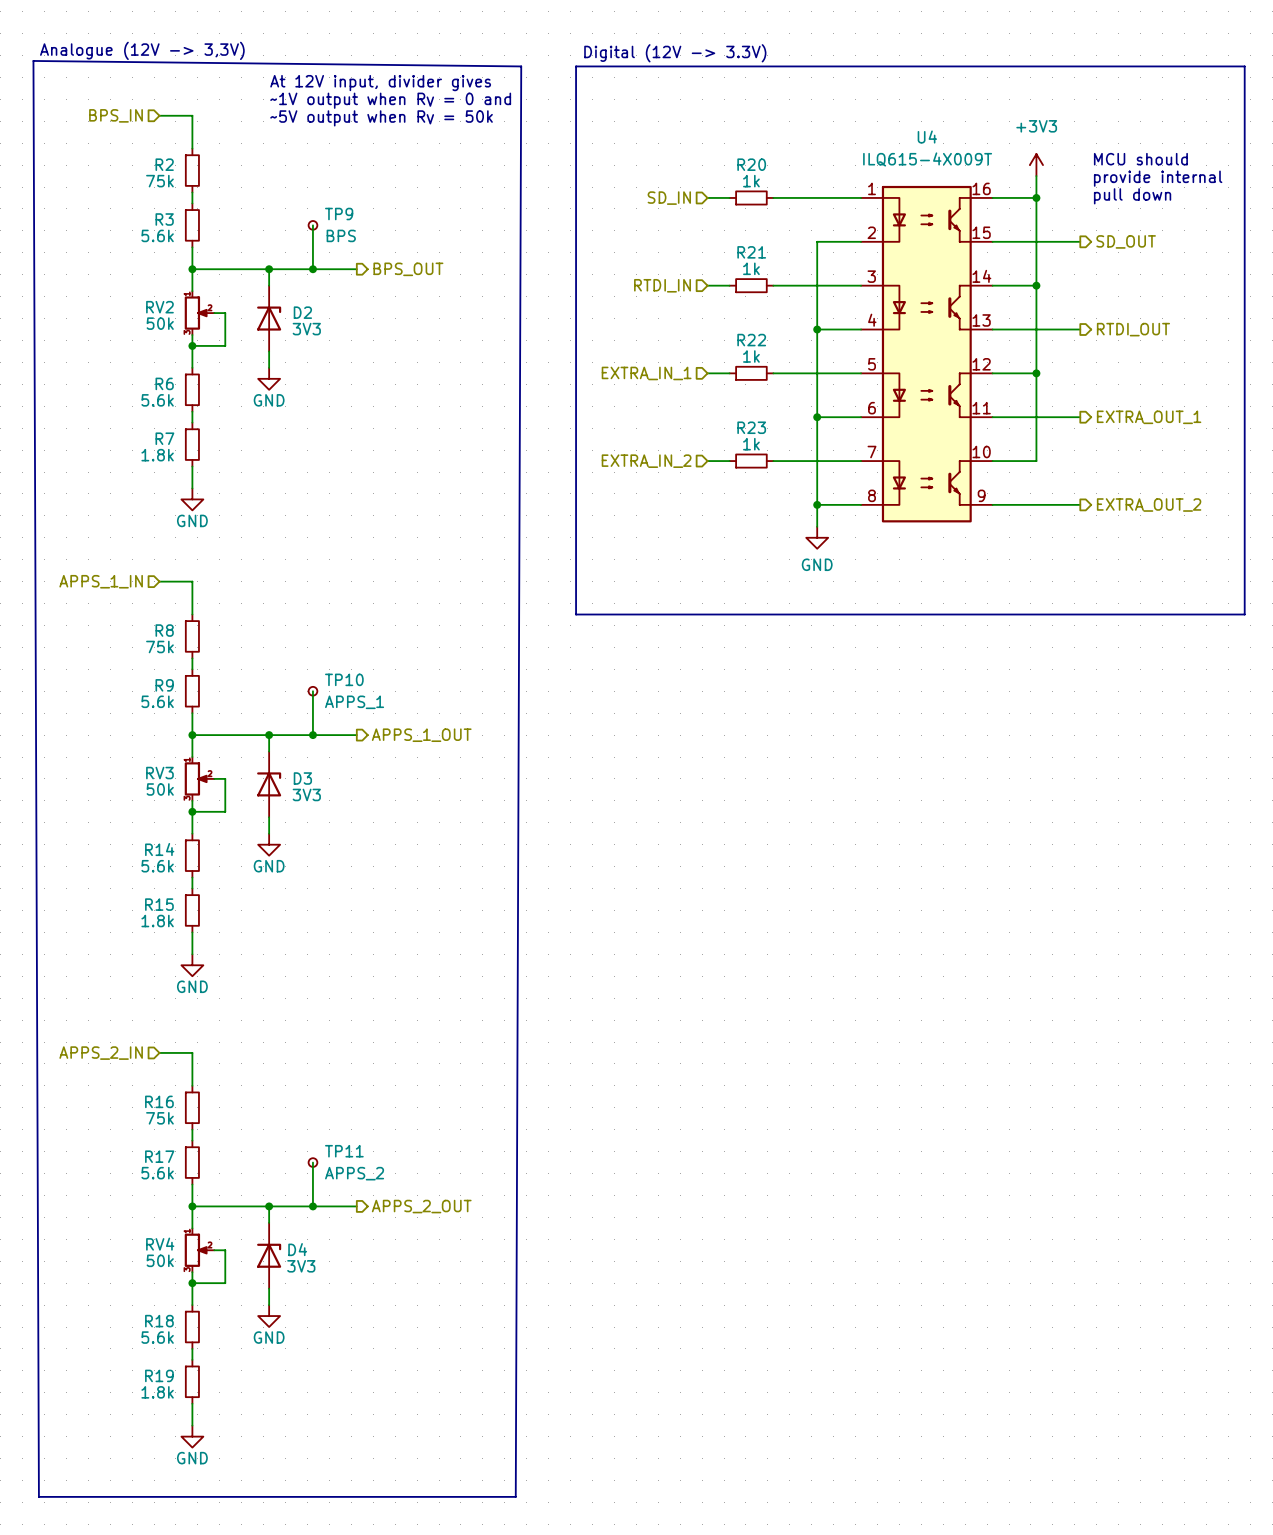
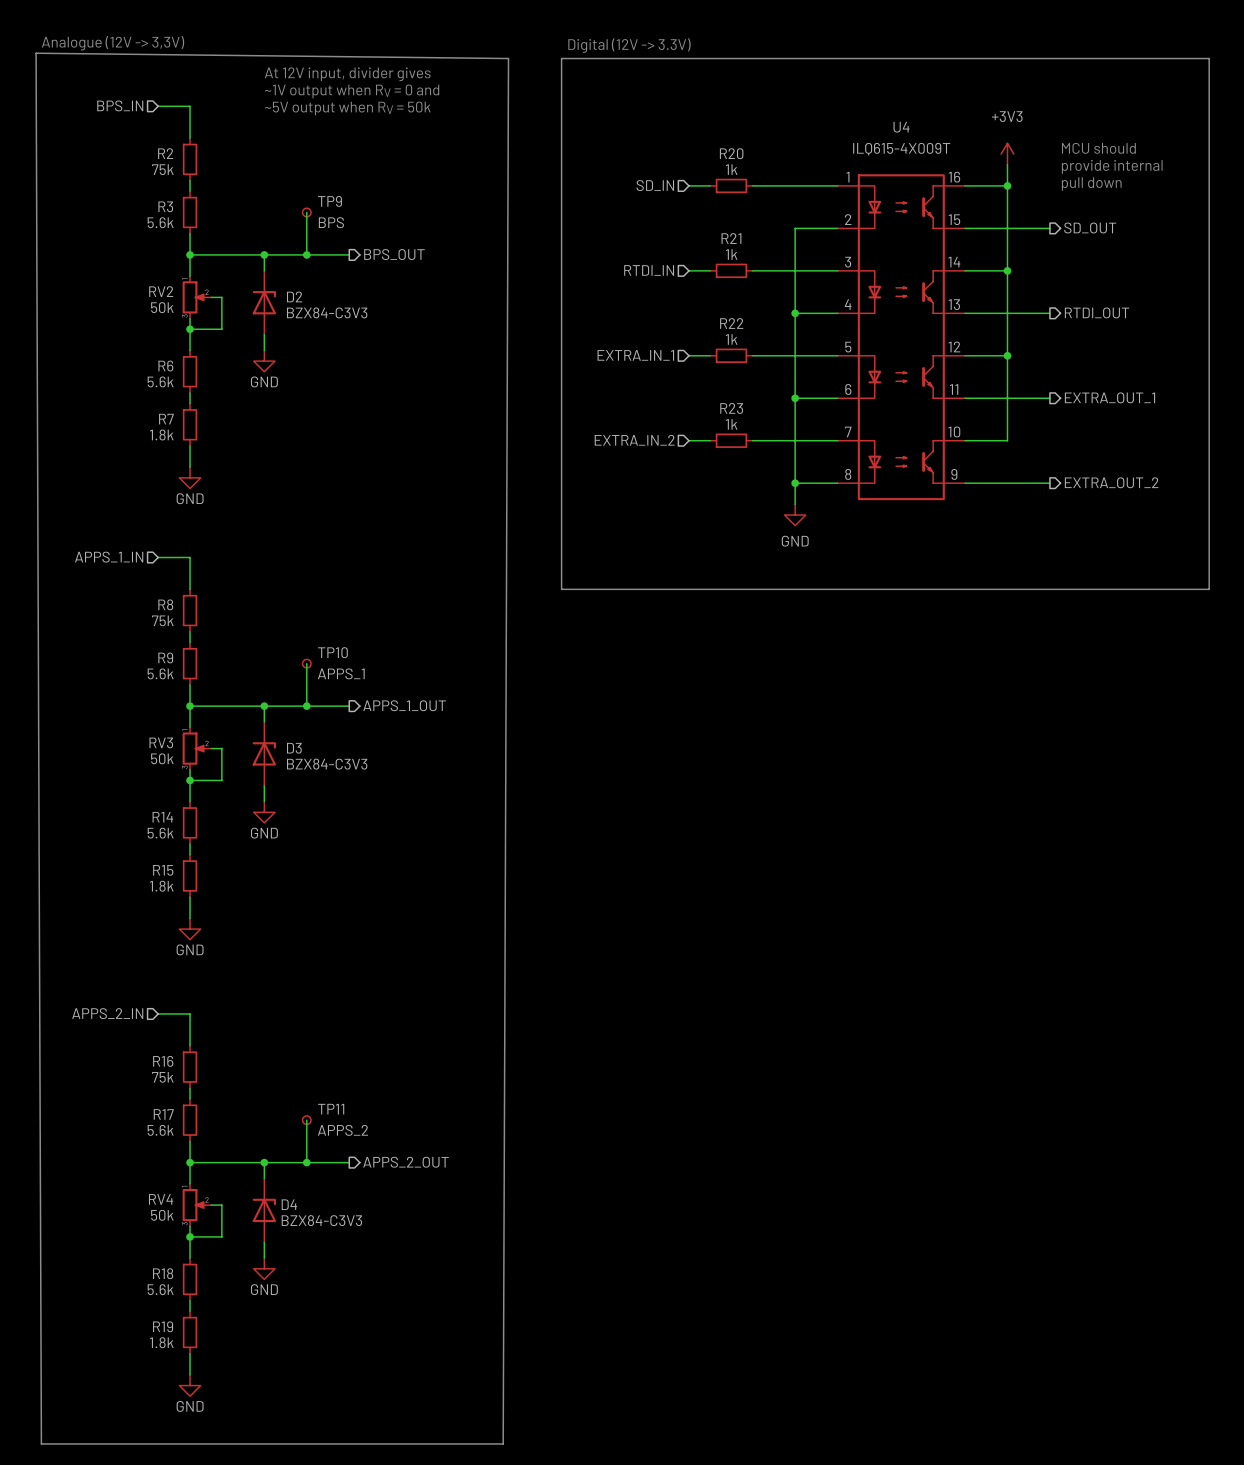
D2 value: 3V3 (306, 329) -> BZX84-C3V3 (327, 312)
D3 value: 3V3 (306, 794) -> BZX84-C3V3 (327, 764)
D4 value: 3V3 (301, 1266) -> BZX84-C3V3 (321, 1220)

